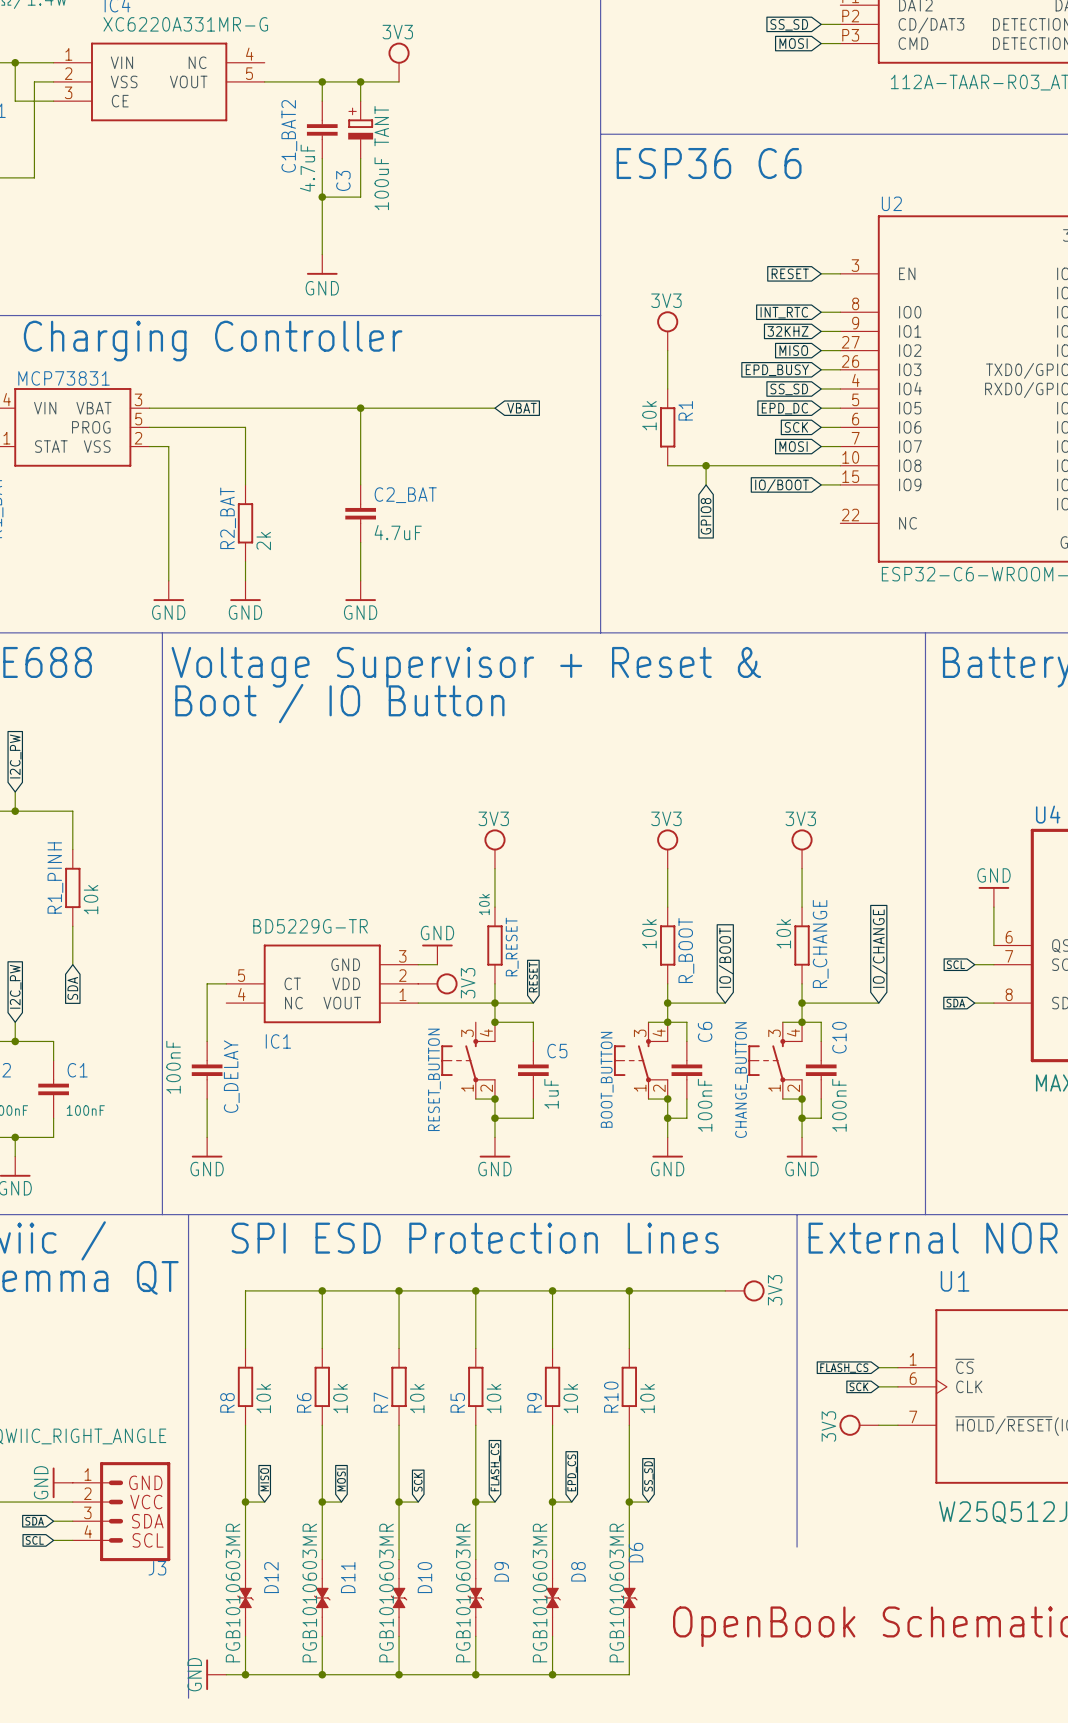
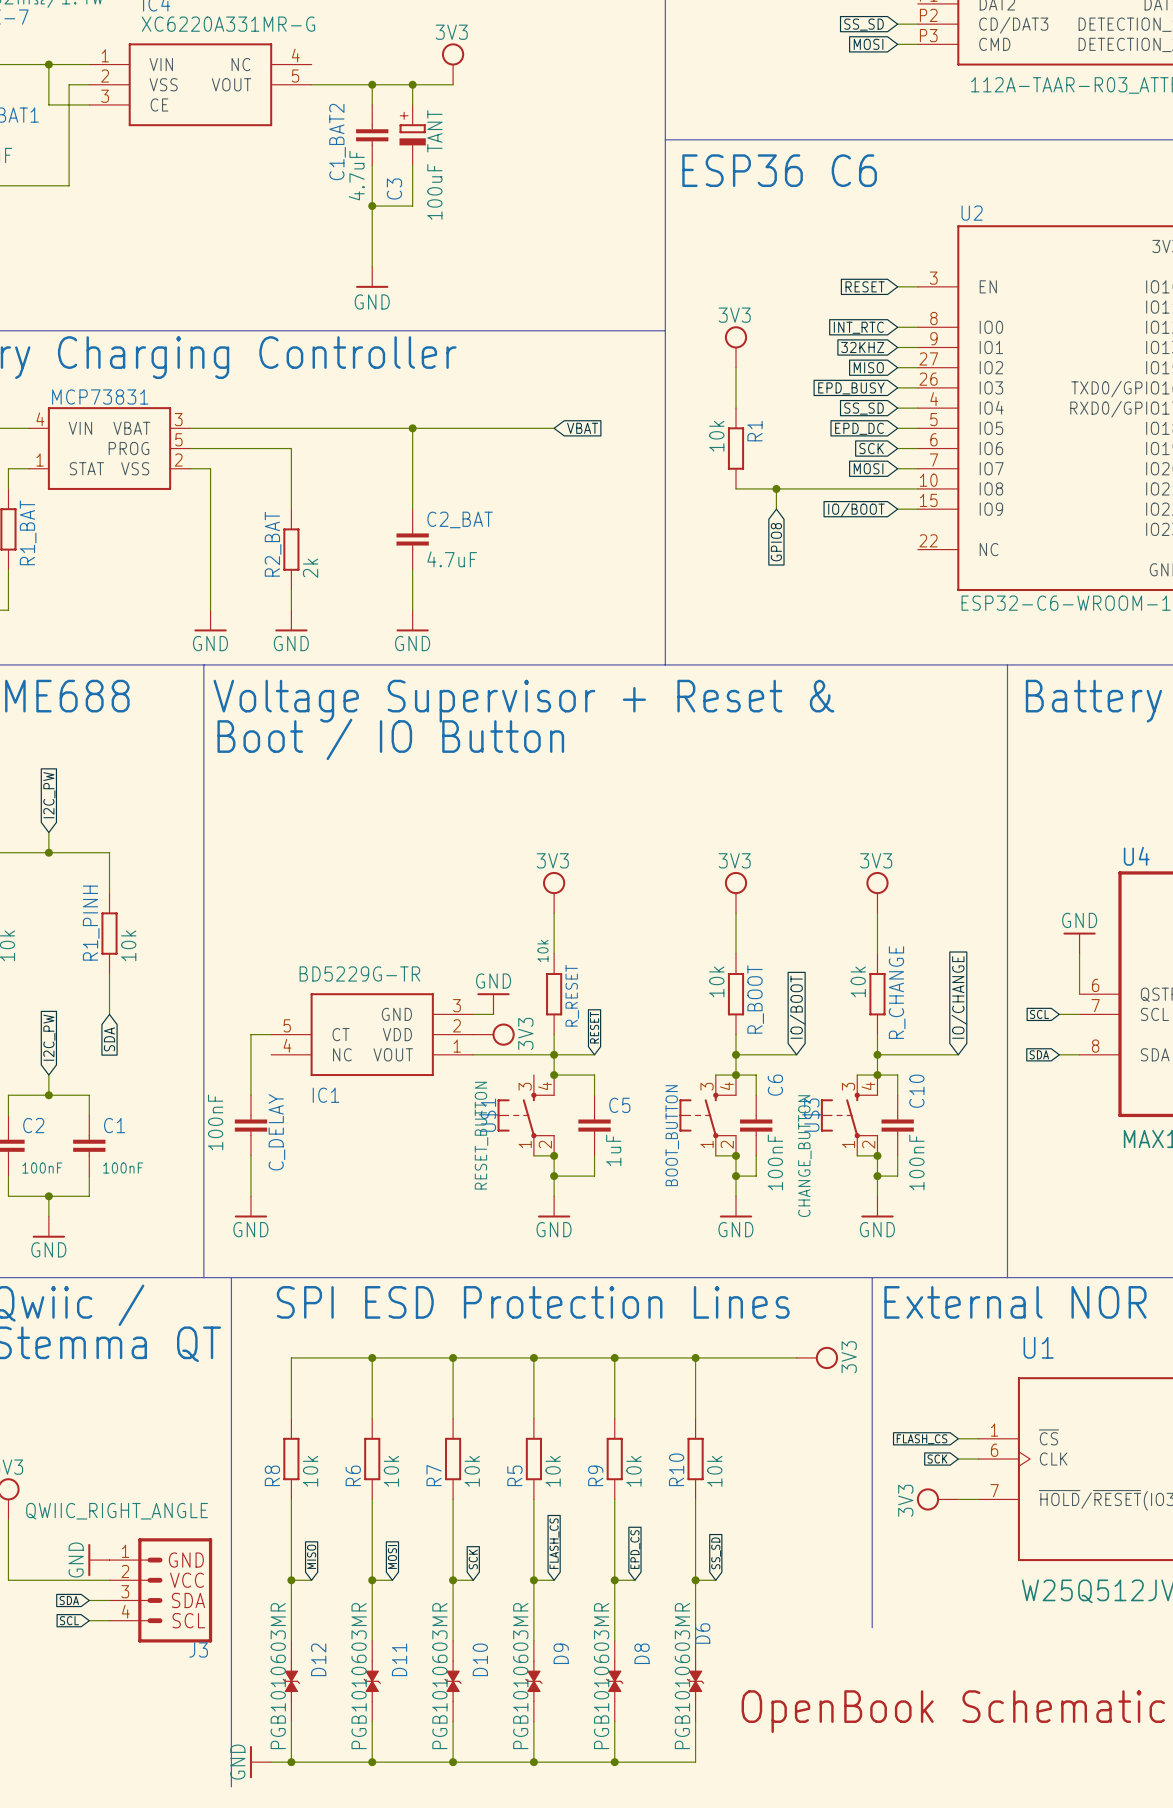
RESET_BUTTON value: none -> RESET_BUTTON (481, 1135)
RESET_BUTTON name: RESET_BUTTON (434, 1079) -> U$1 (488, 1115)
CHANGE_BUTTON name: CHANGE_BUTTON (741, 1080) -> U$3 (811, 1115)
CHANGE_BUTTON value: none -> CHANGE_BUTTON (804, 1156)

